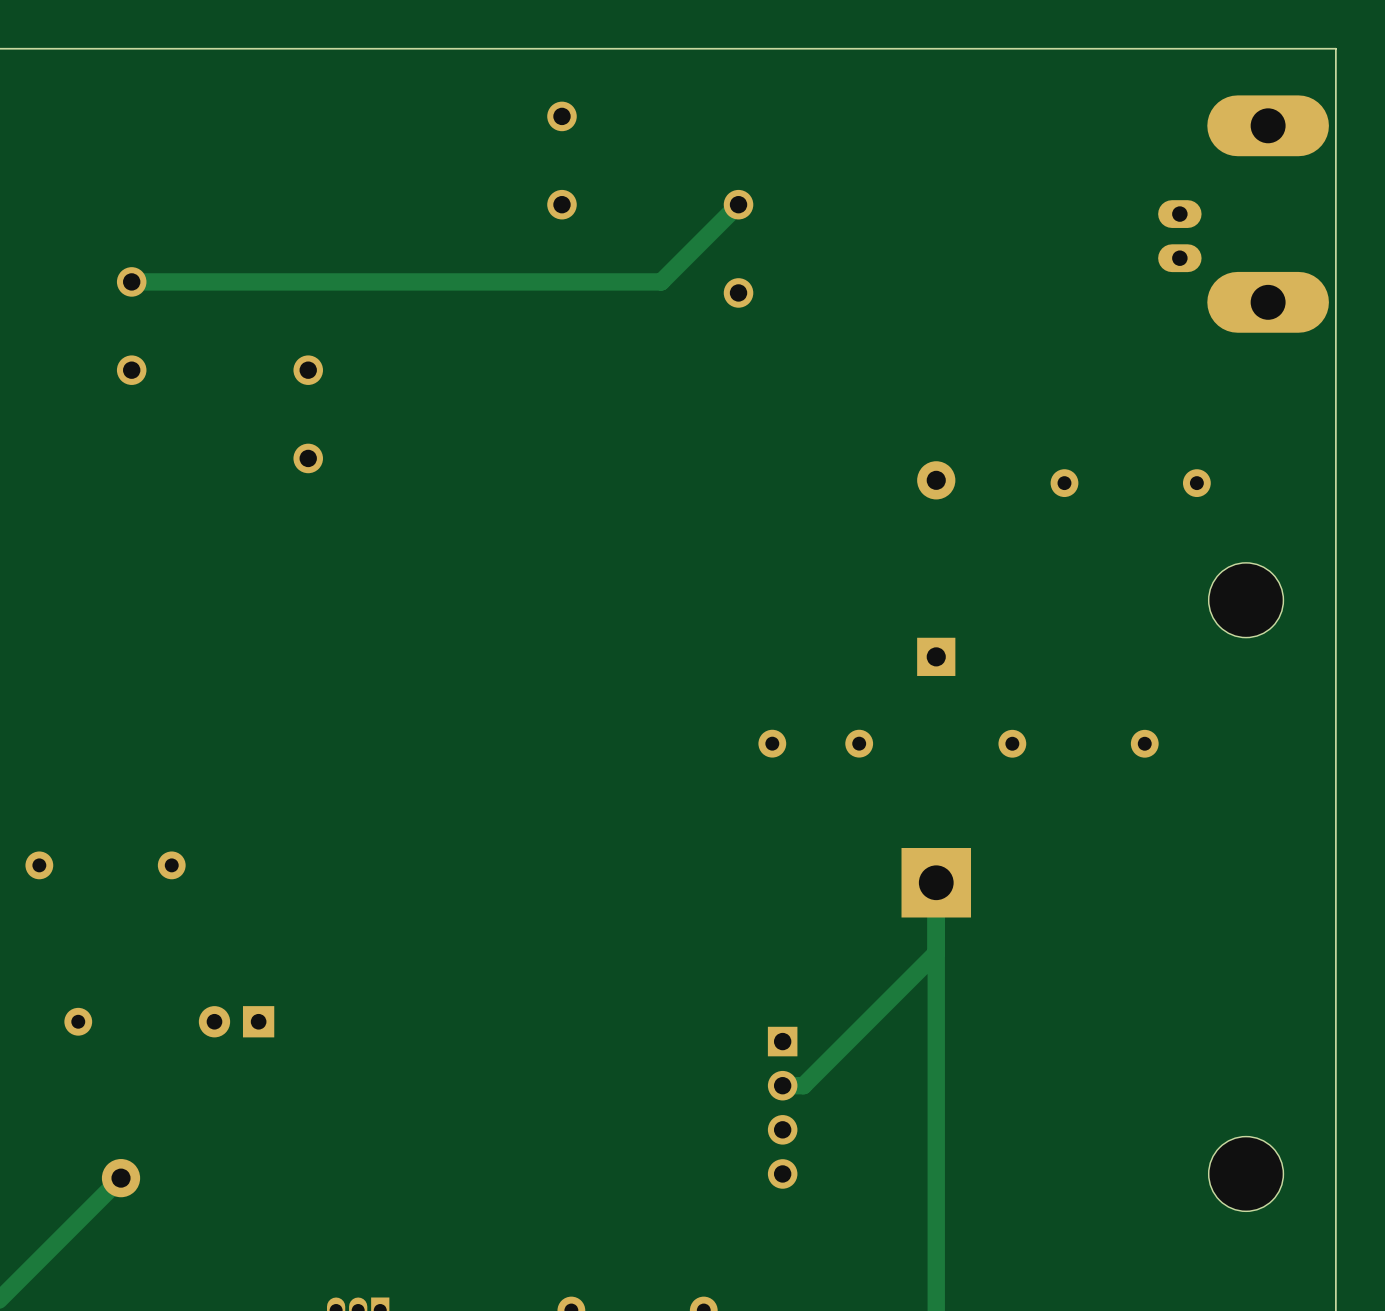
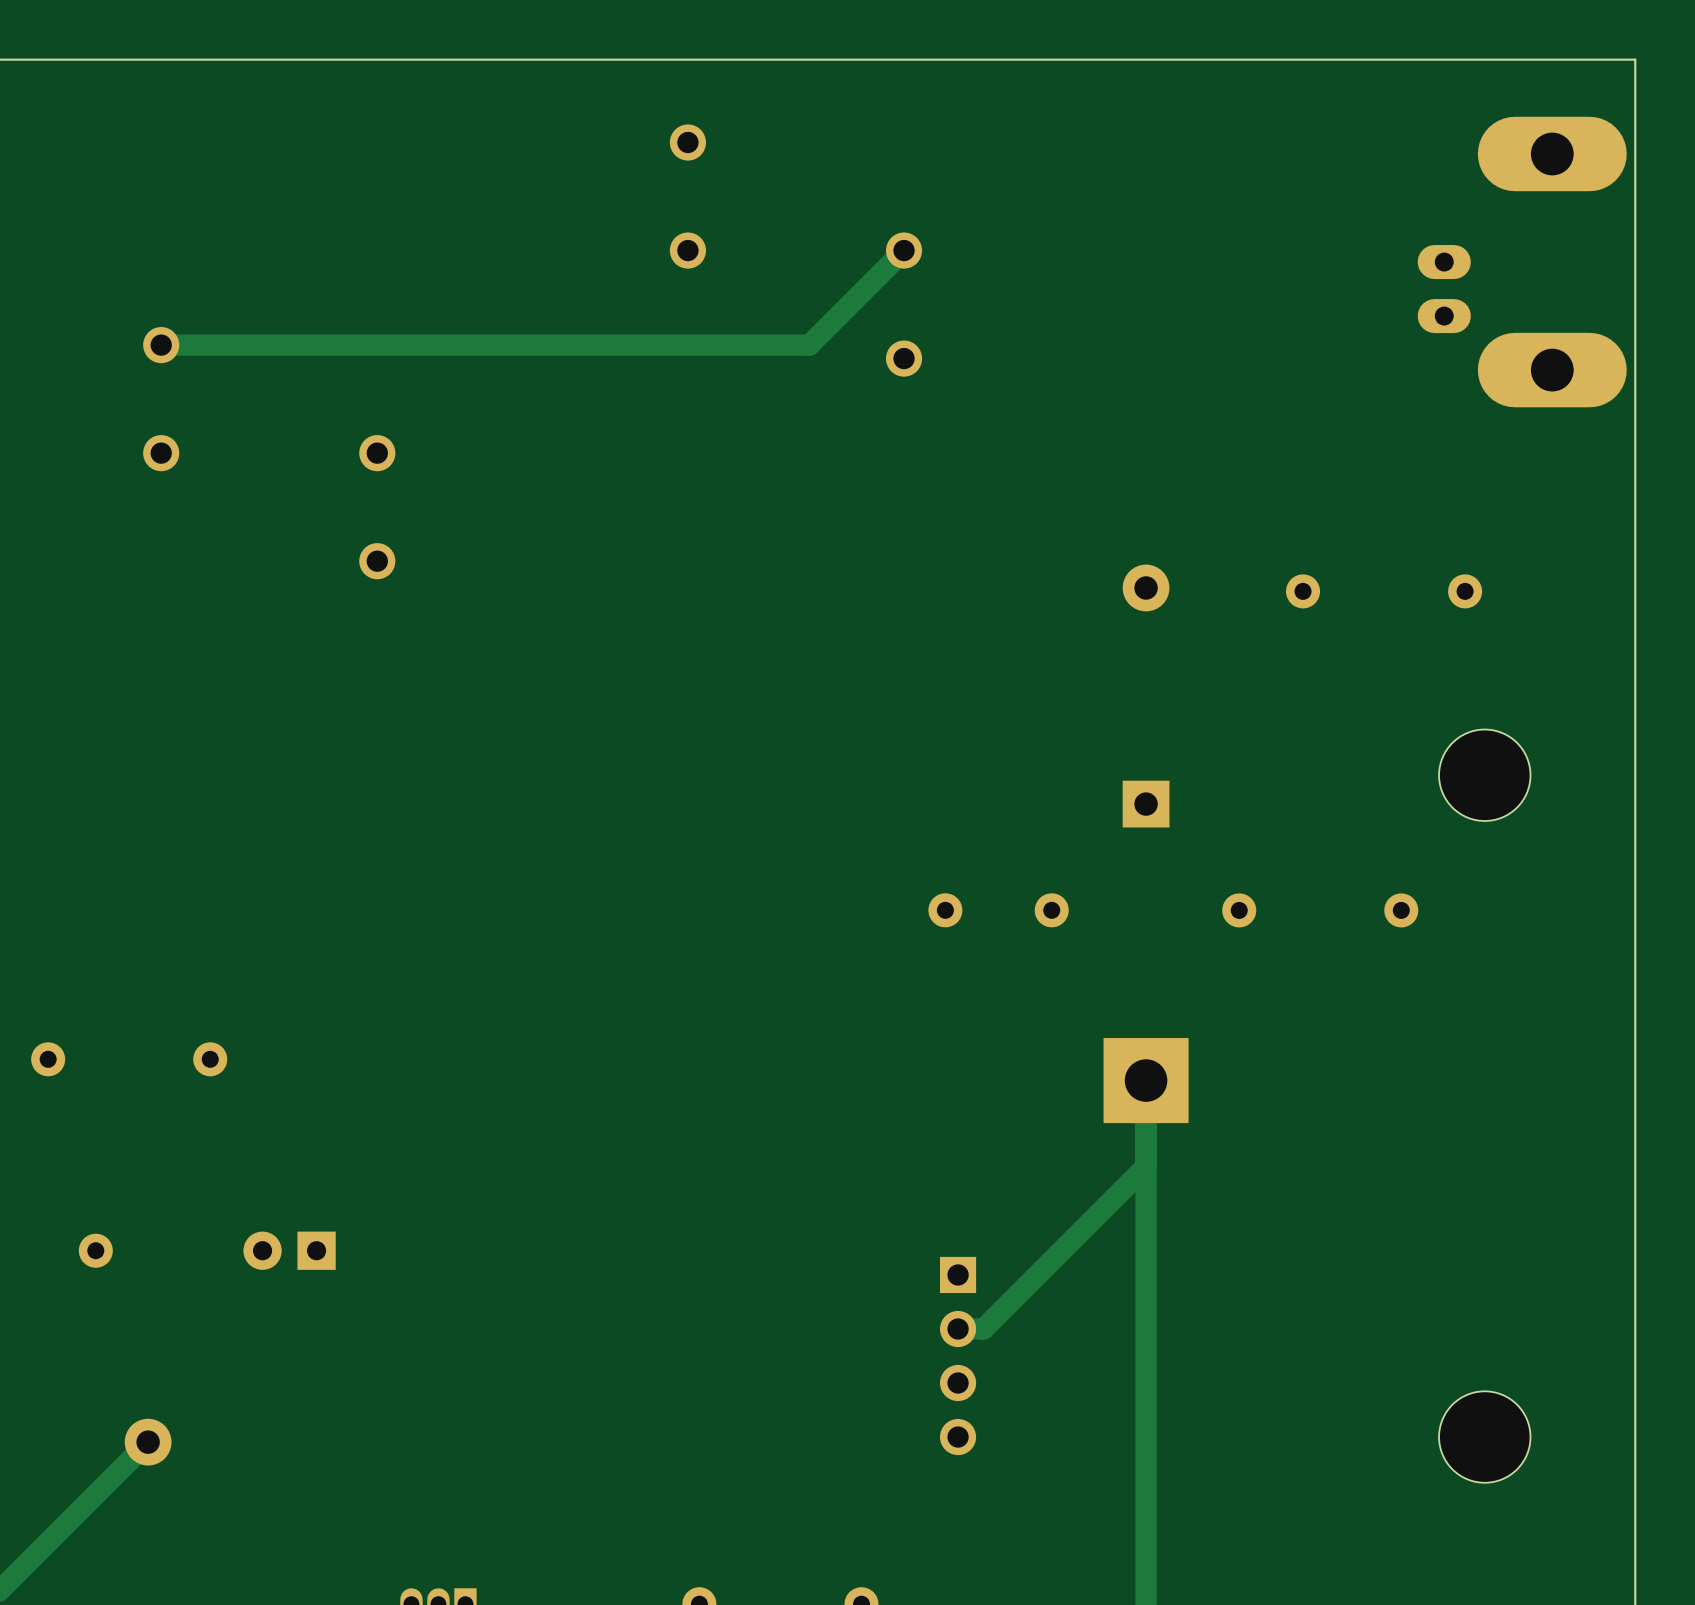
part position: (1246, 600) -> (1484, 775)
part position: (1246, 1173) -> (1484, 1437)

